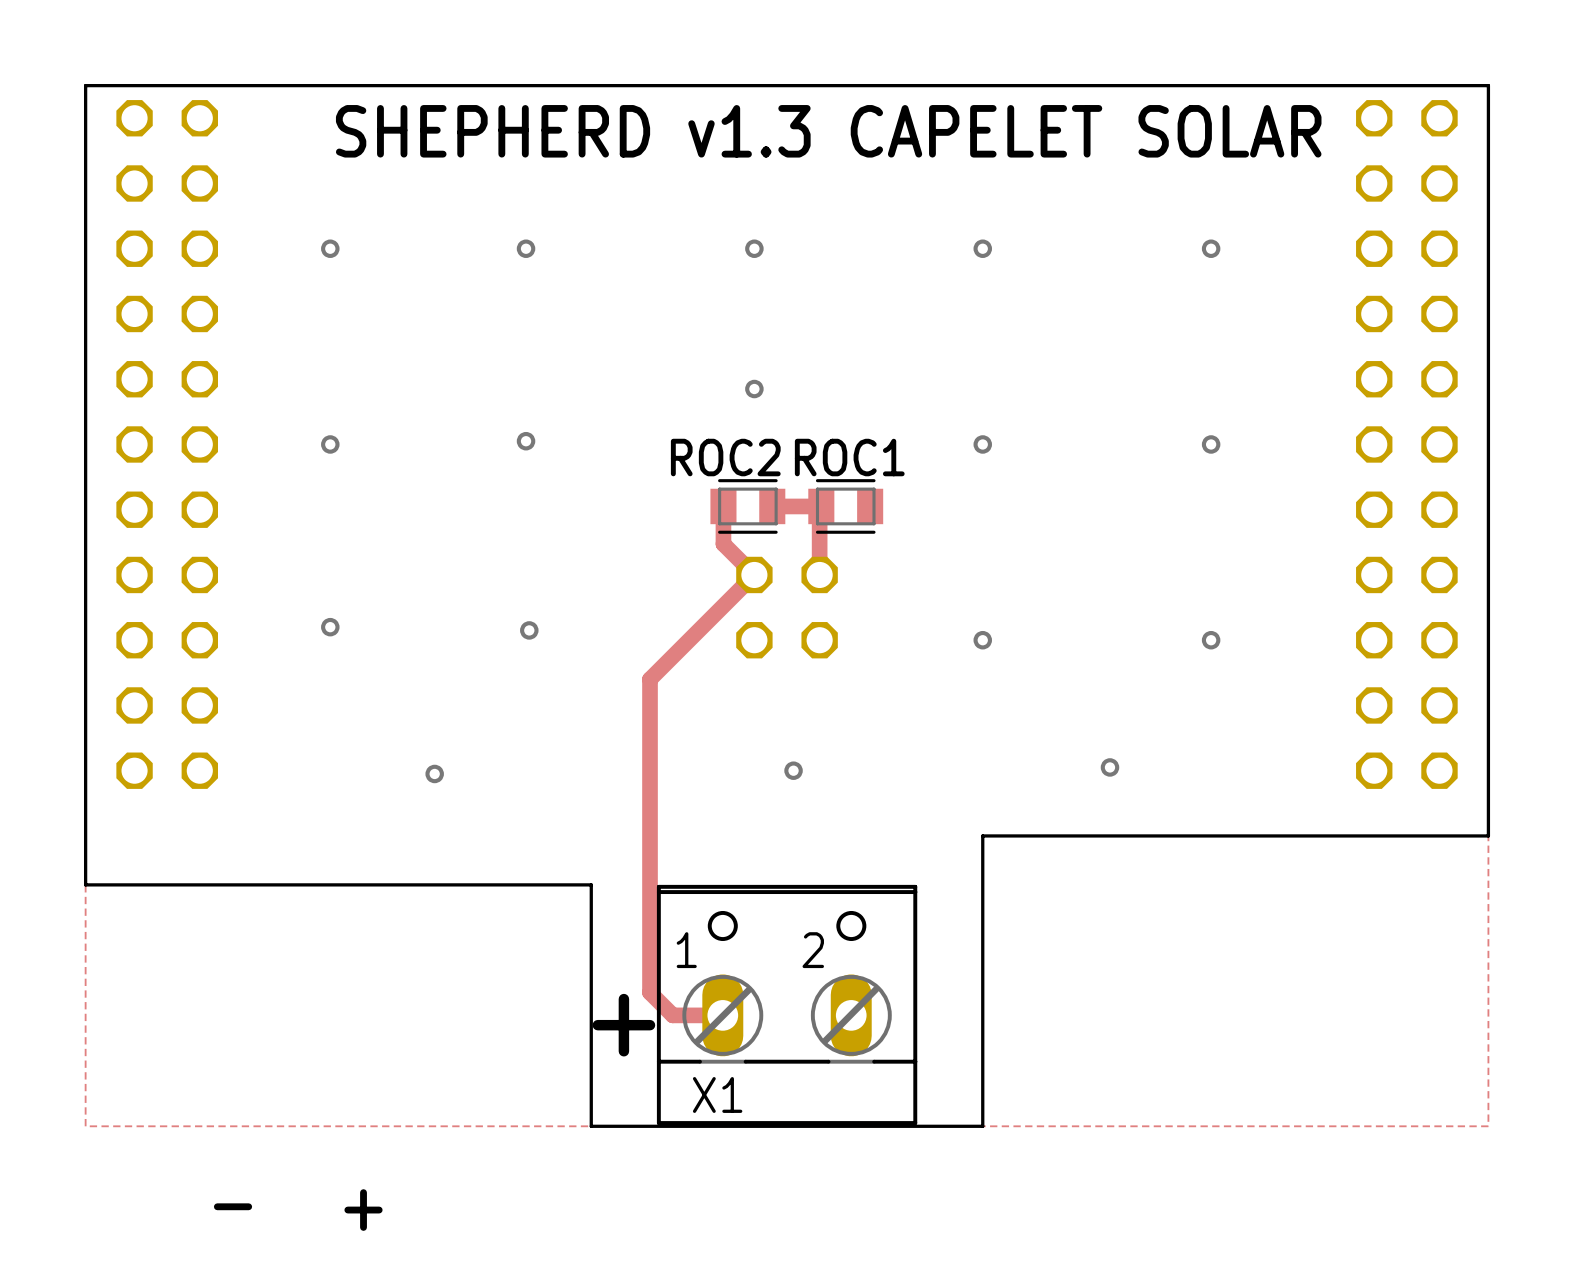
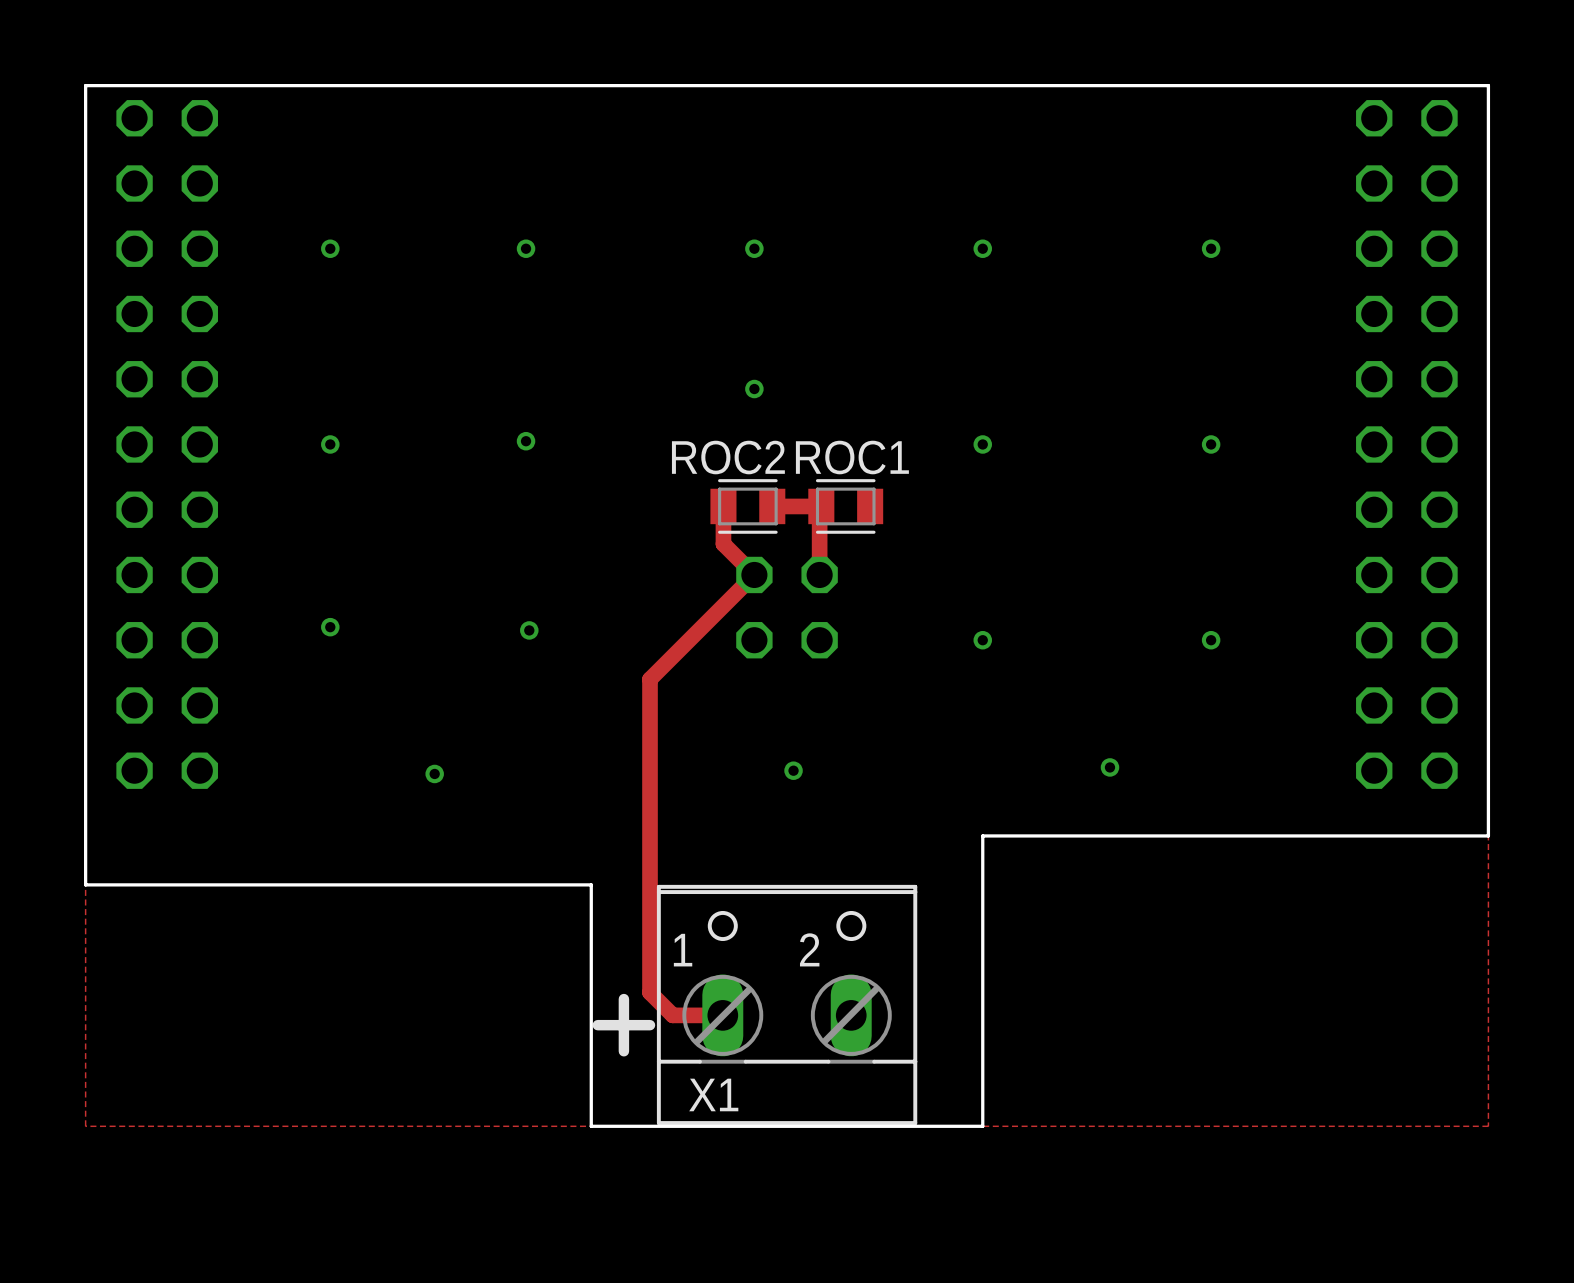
text: SHEPHERD v1.3 CAPELET SOLAR (828, 131) -> none
text: - (233, 1206) -> none
text: + (363, 1210) -> none

